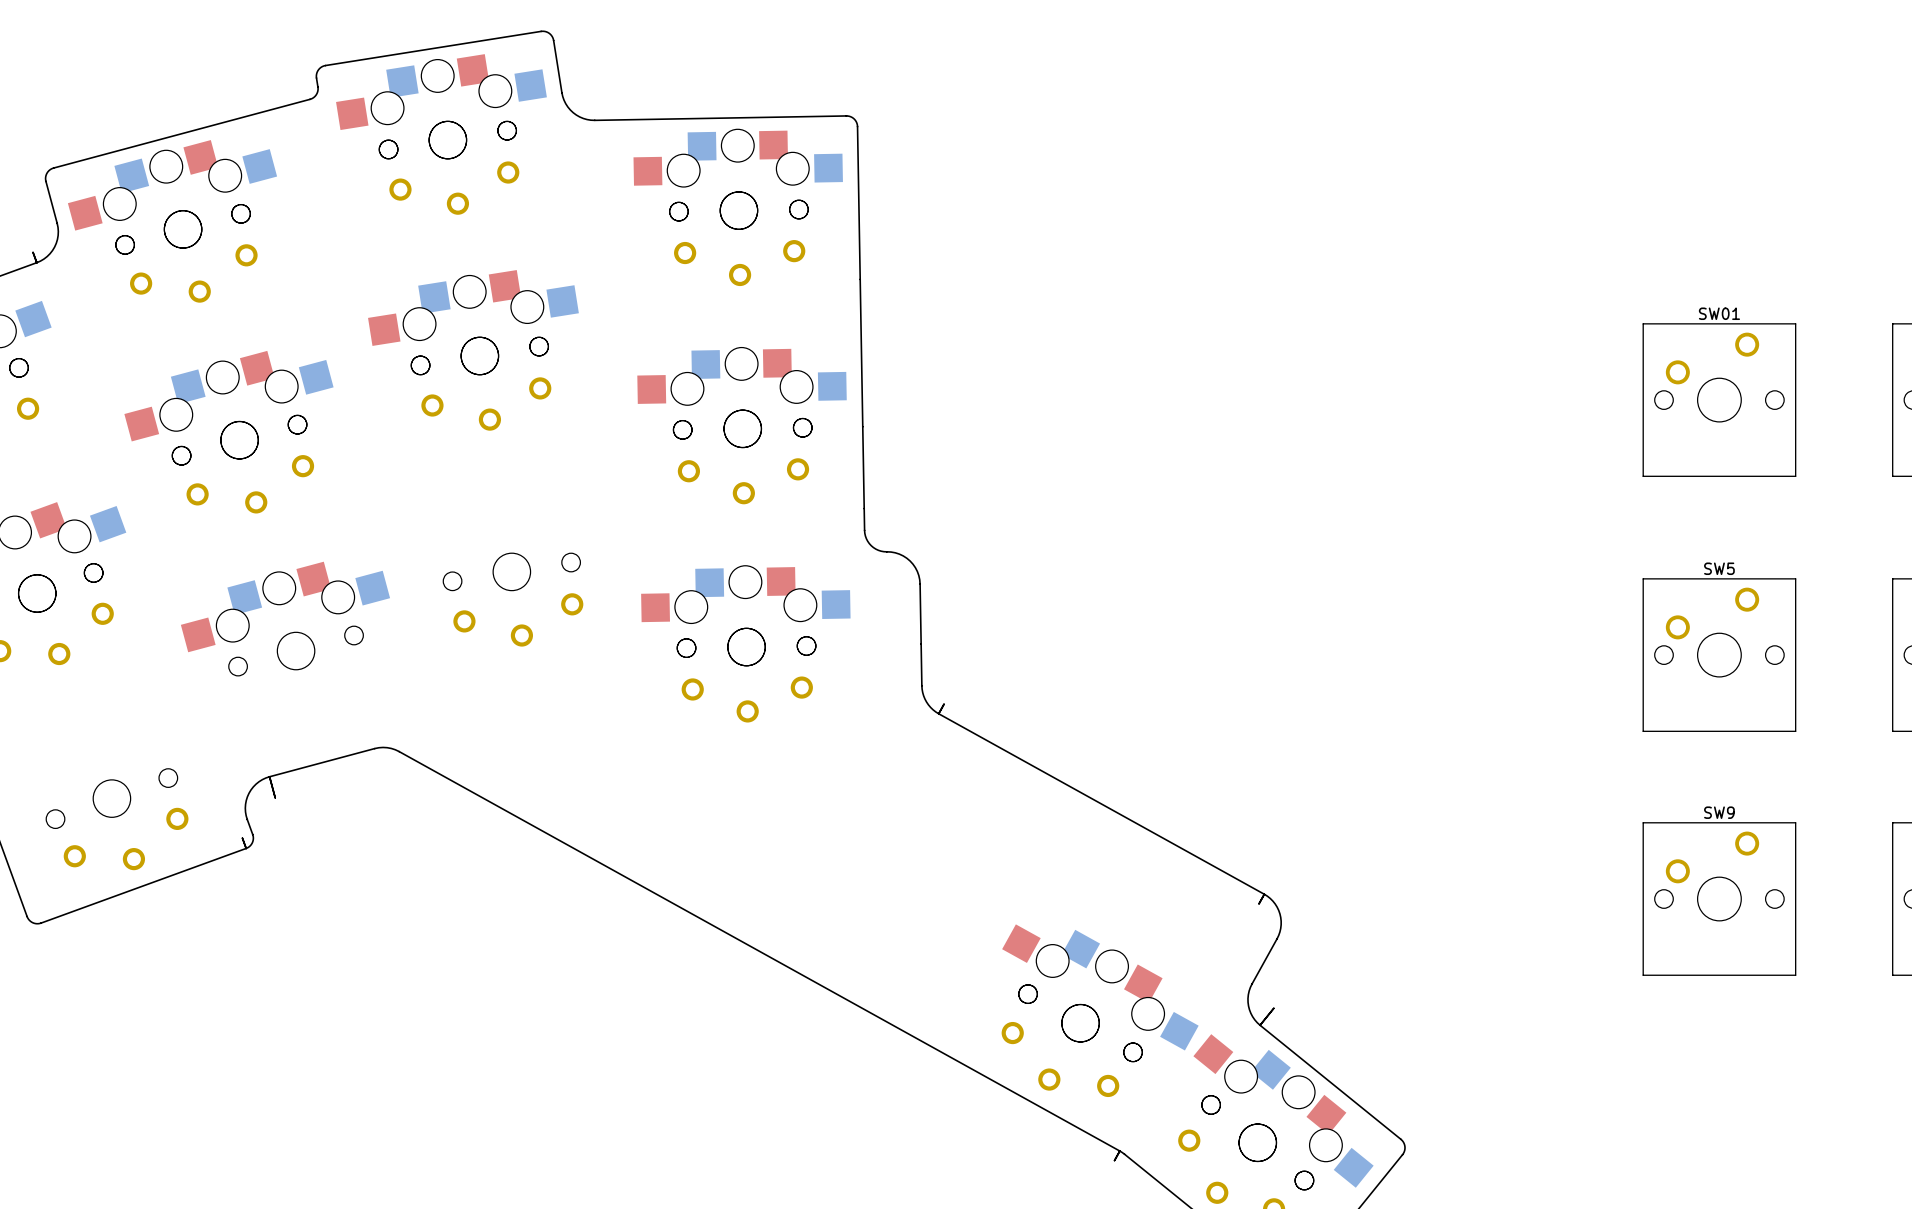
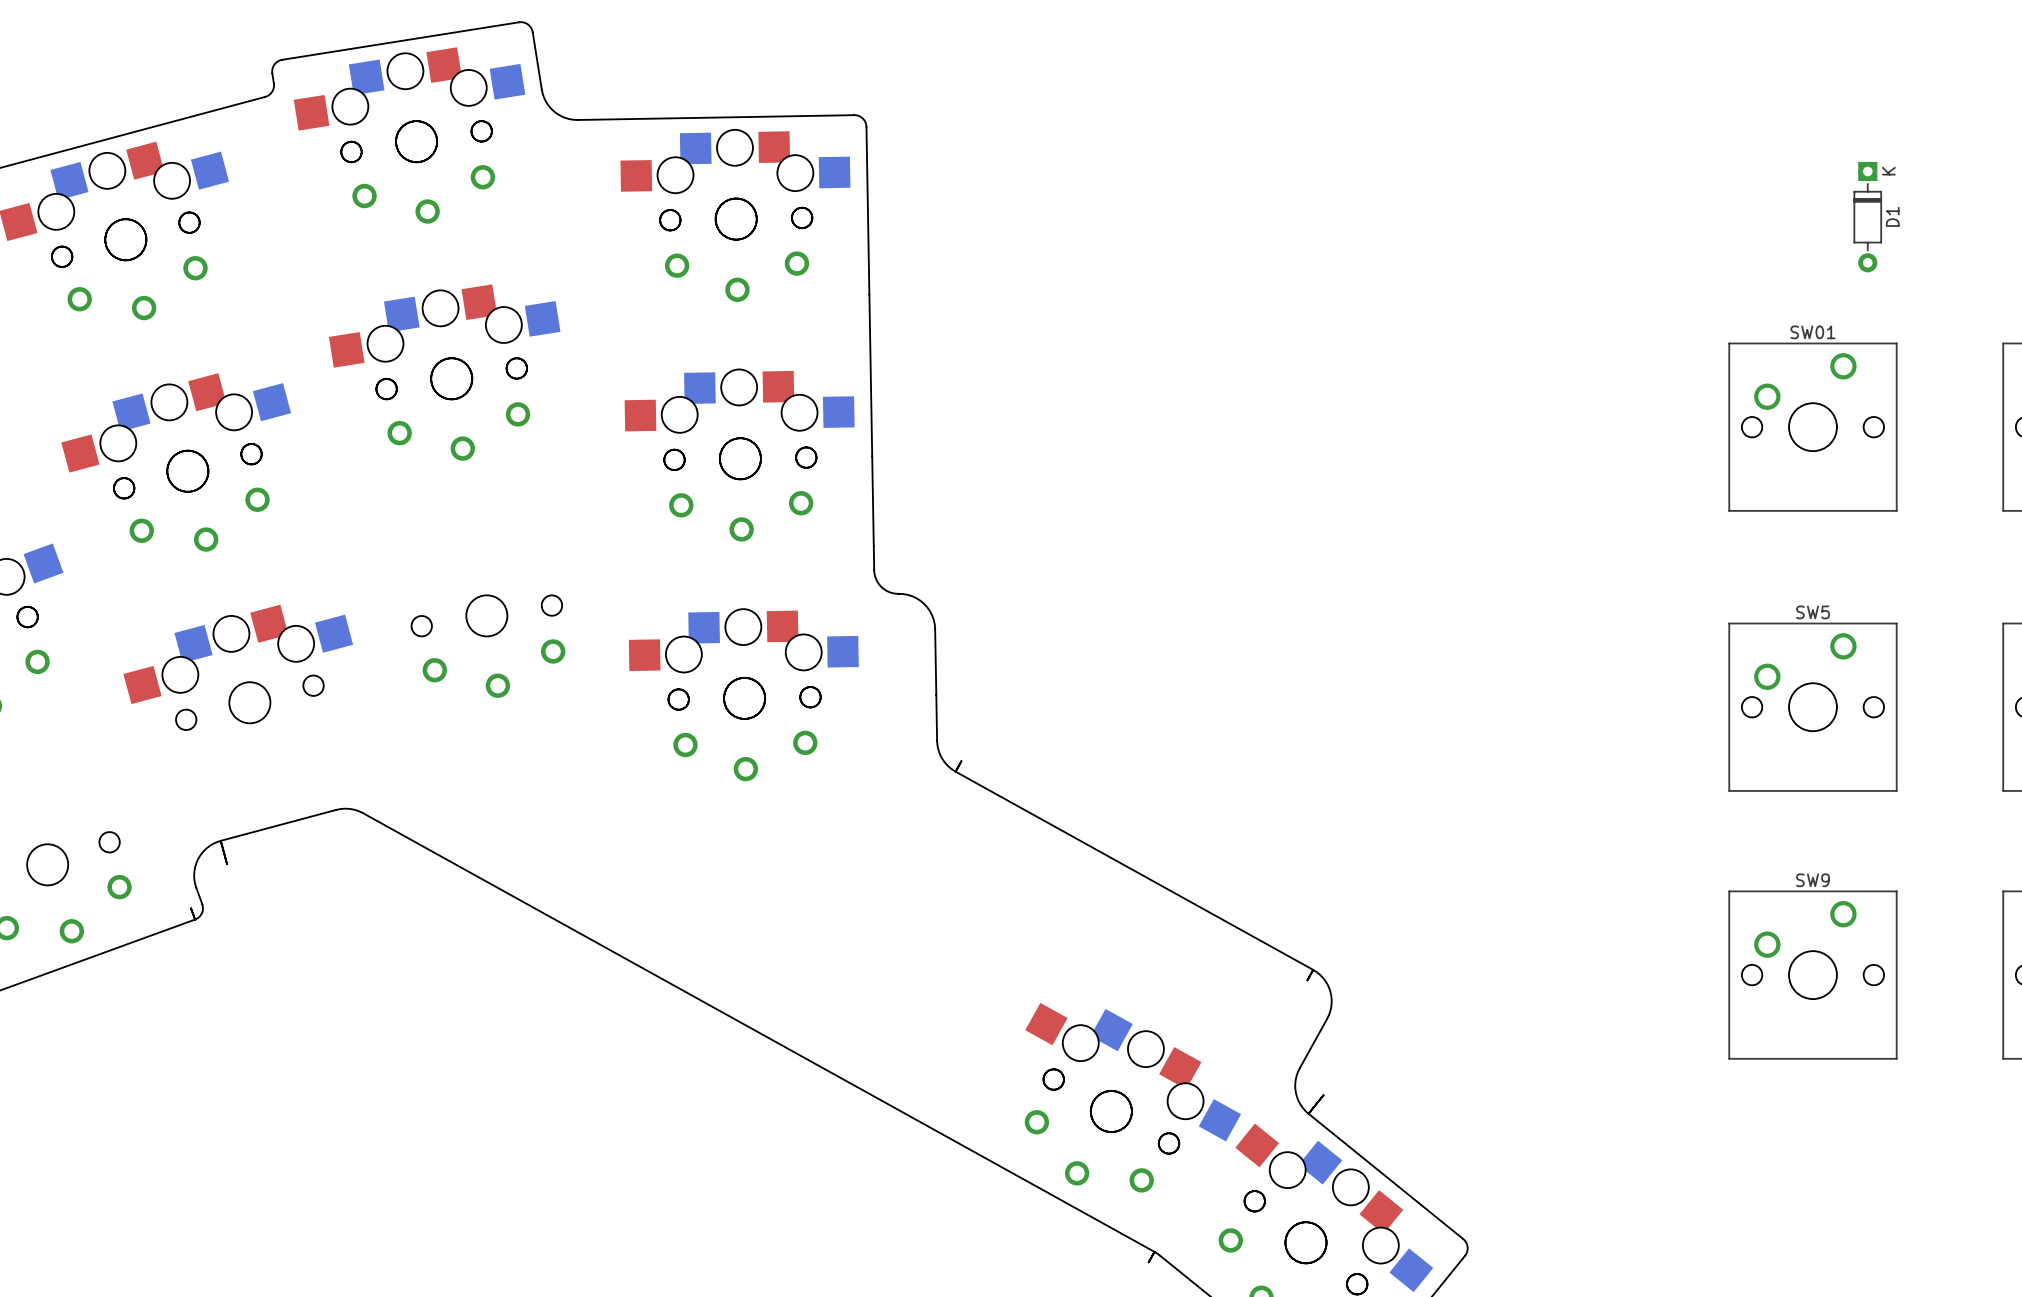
D1: none -> (1867, 217)

